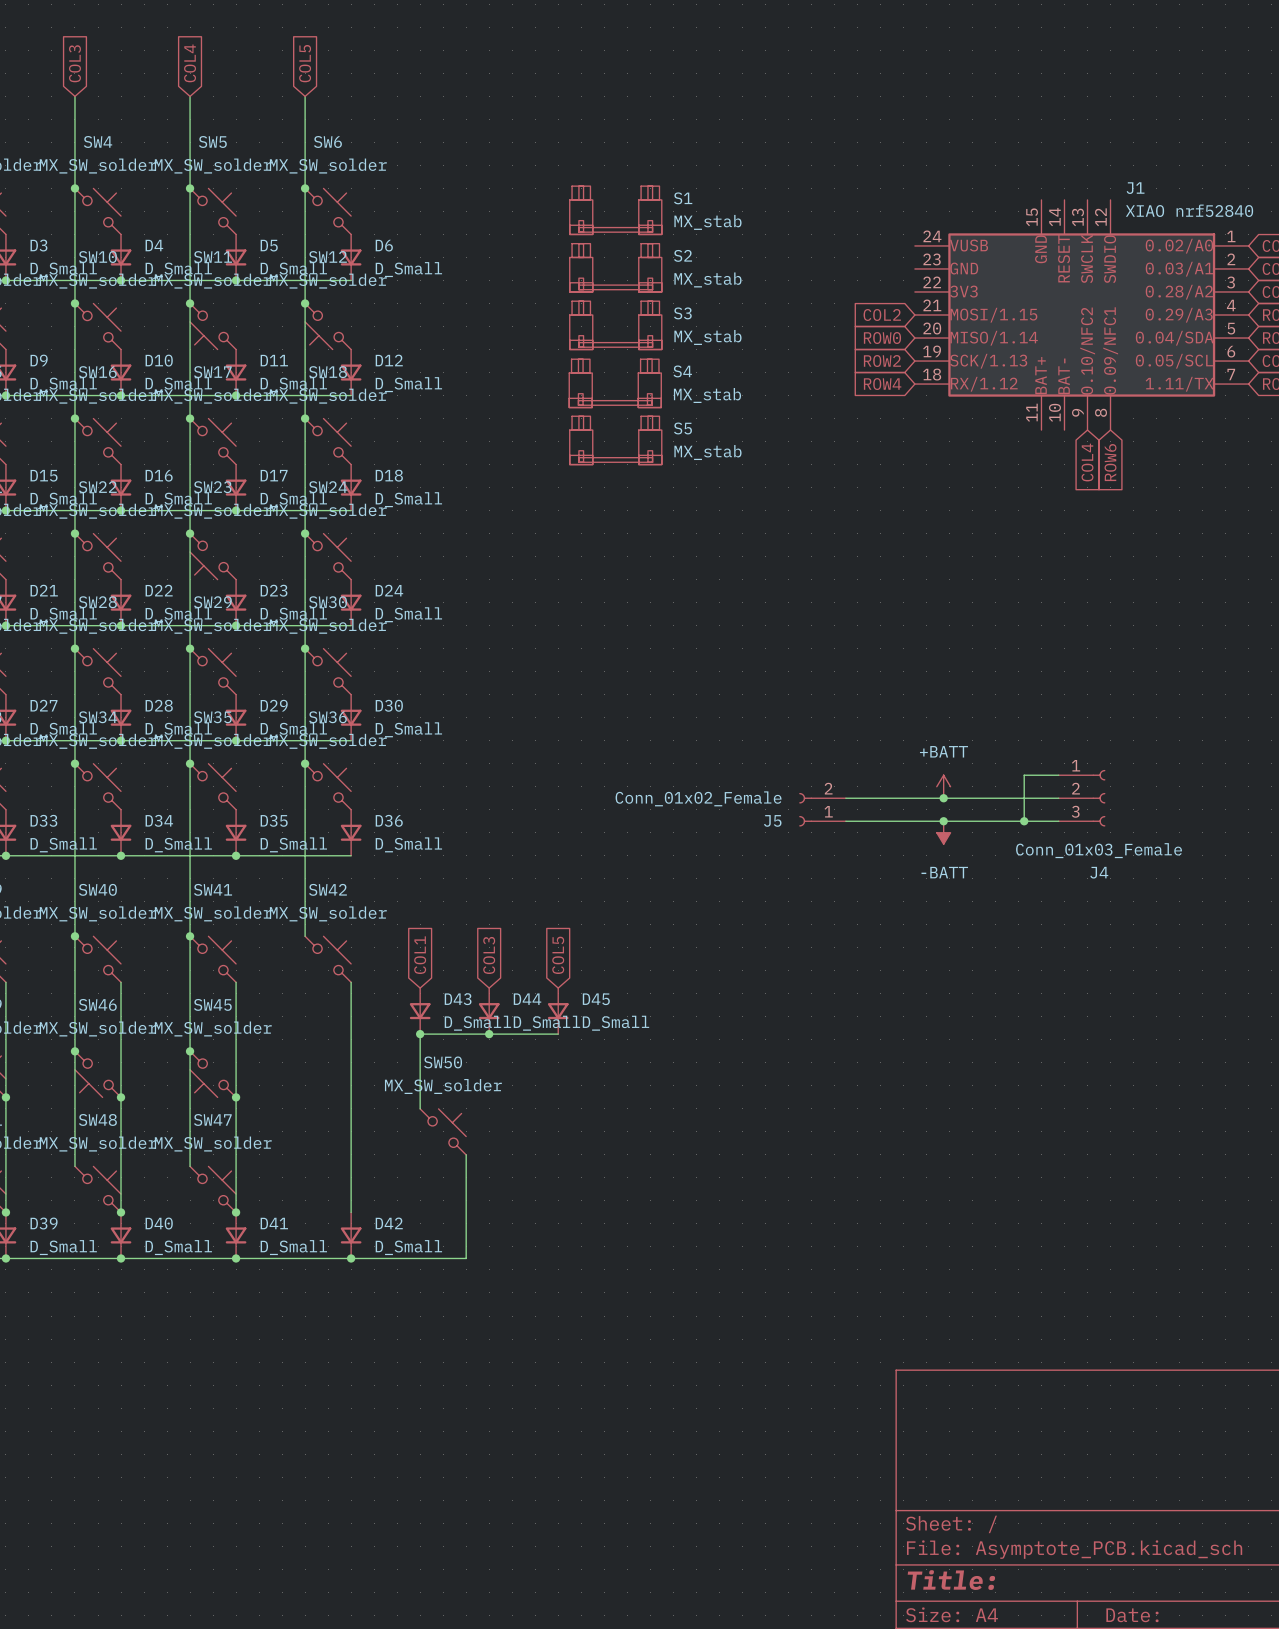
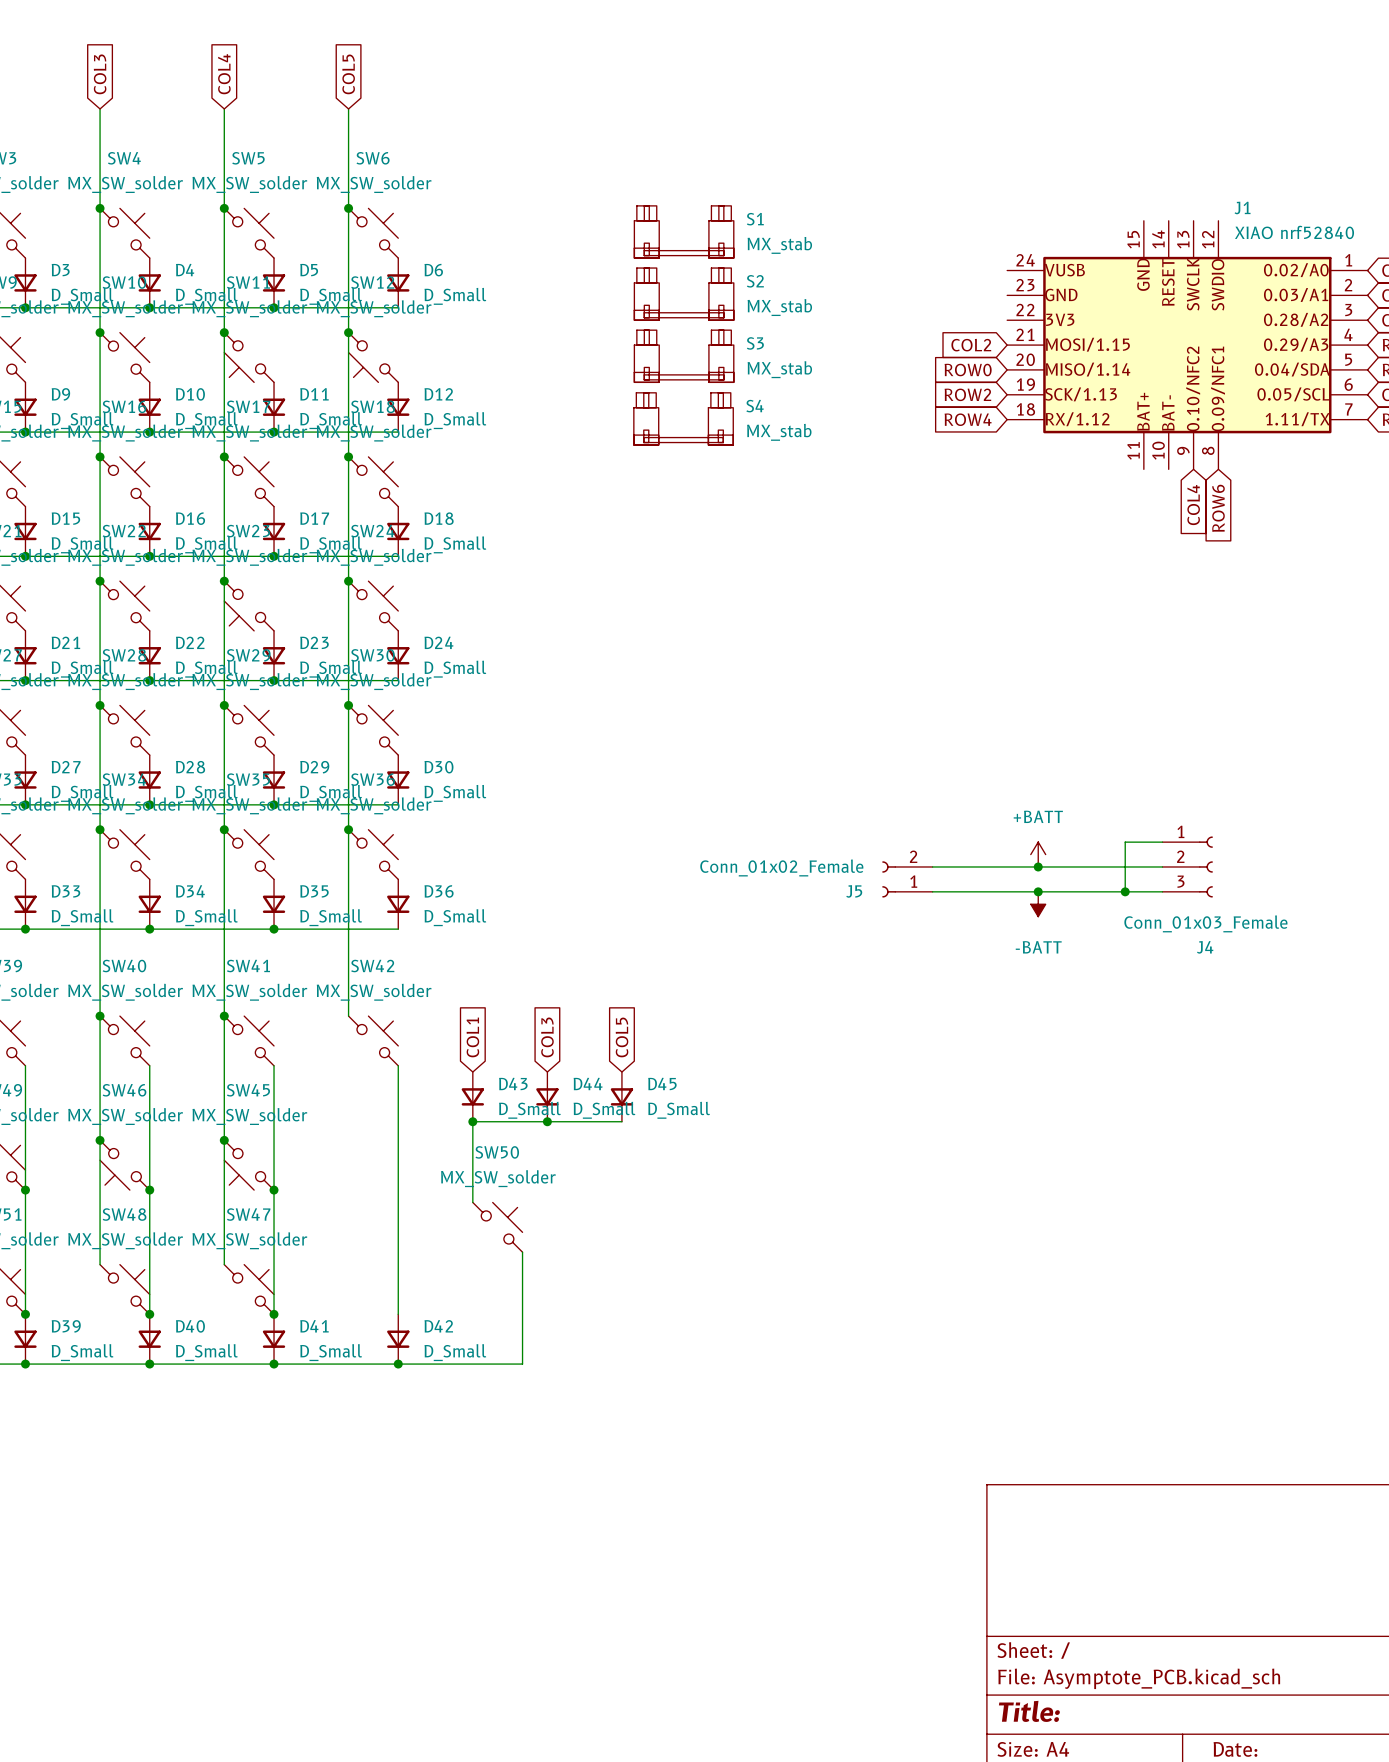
S5: MX_stab (615, 440) -> none

